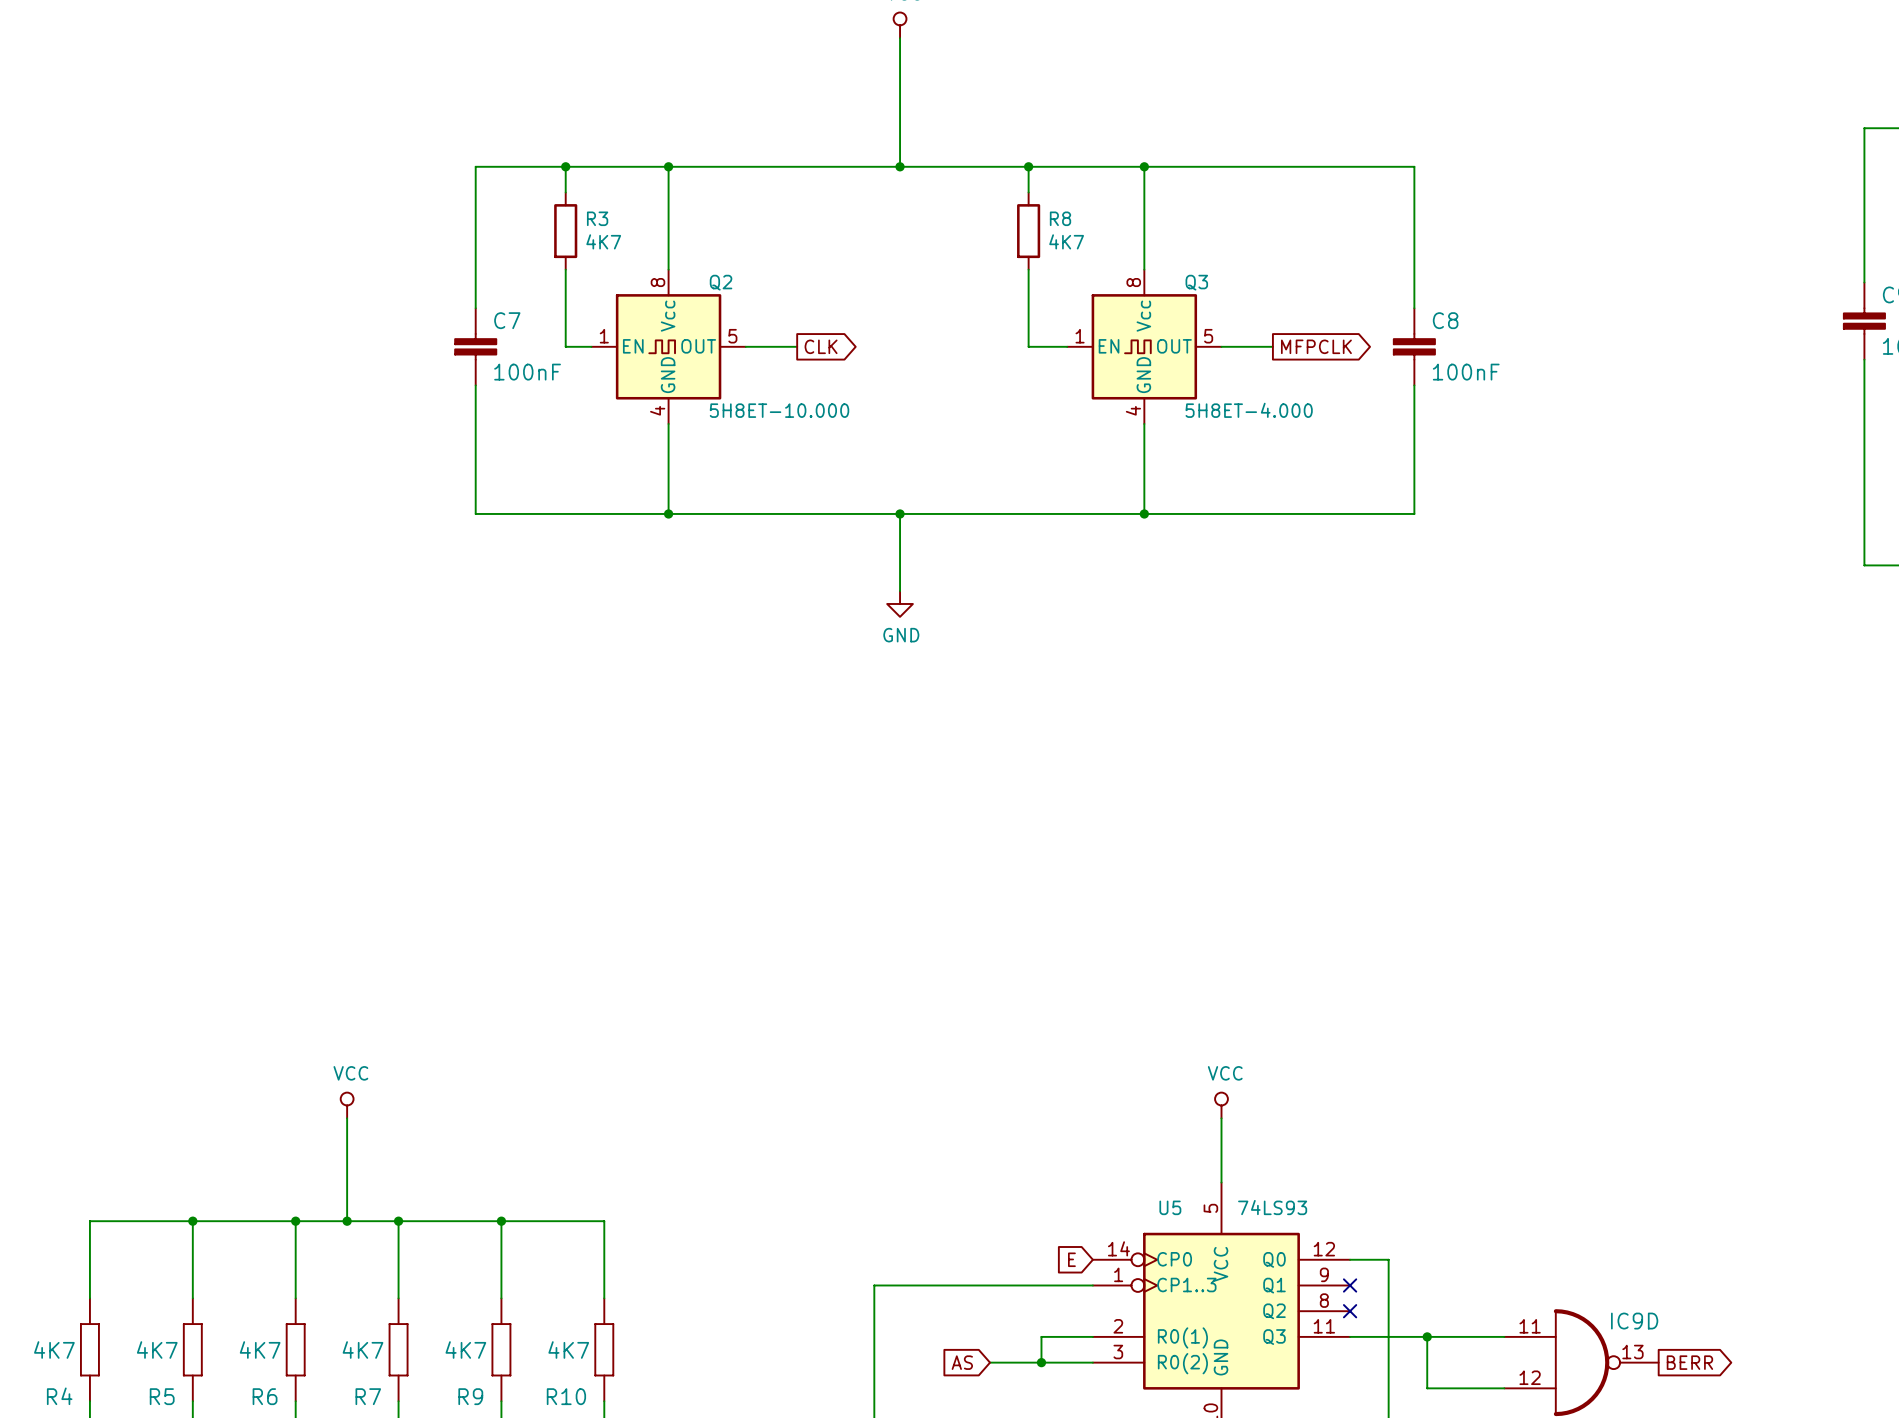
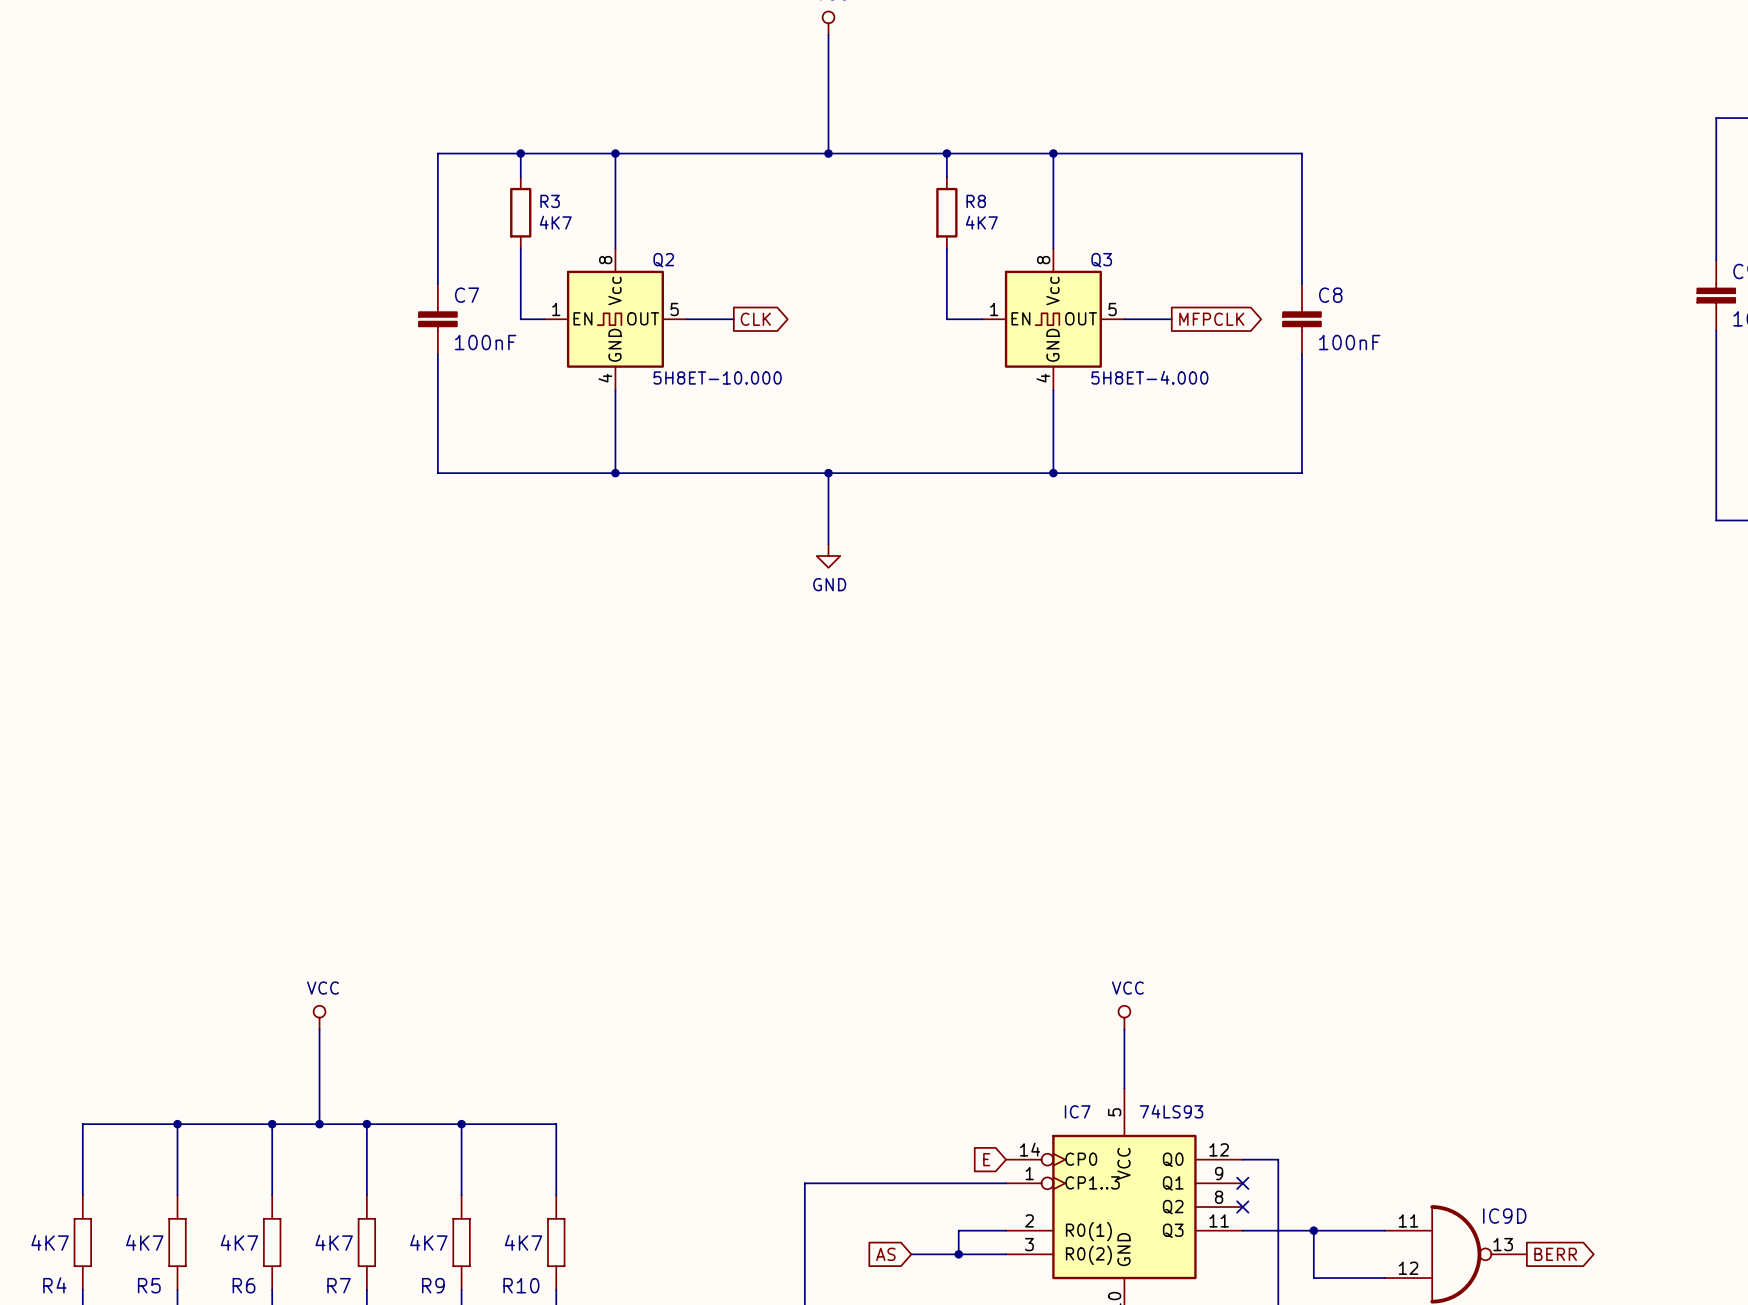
U5 name: U5 (1170, 1207) -> IC7 (1077, 1111)

